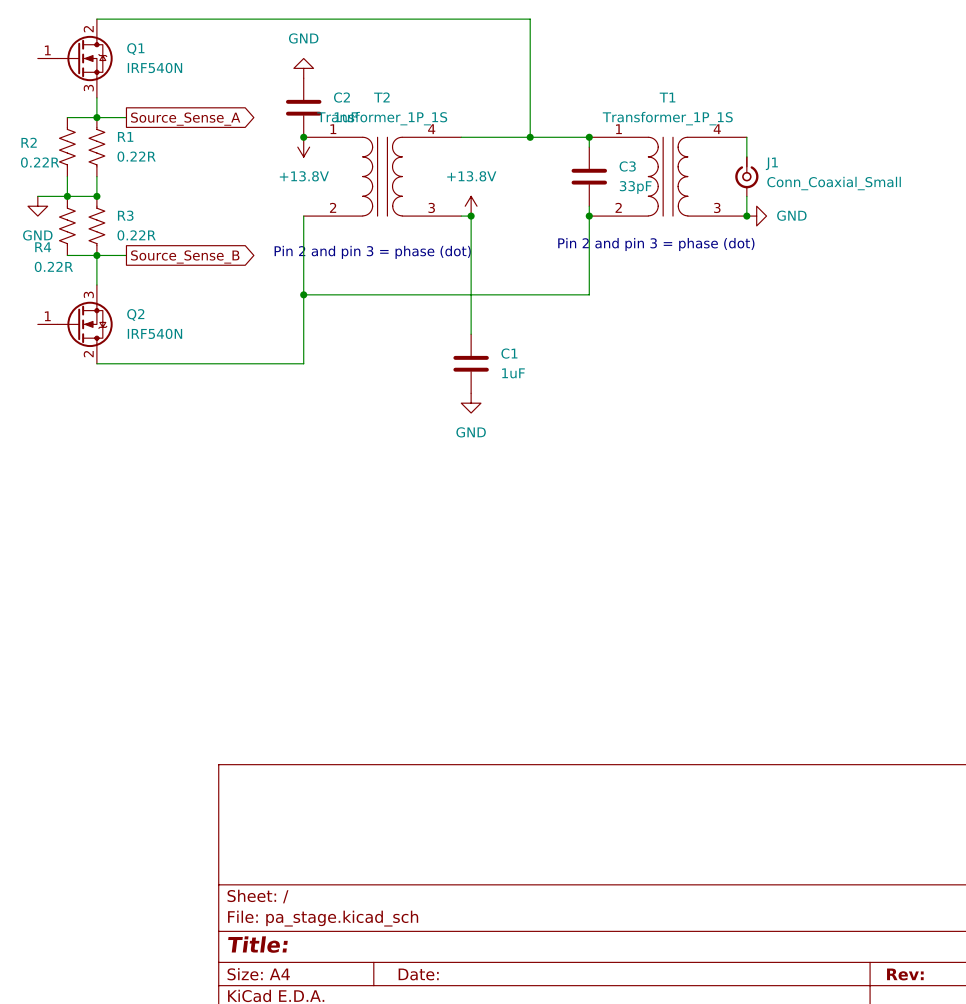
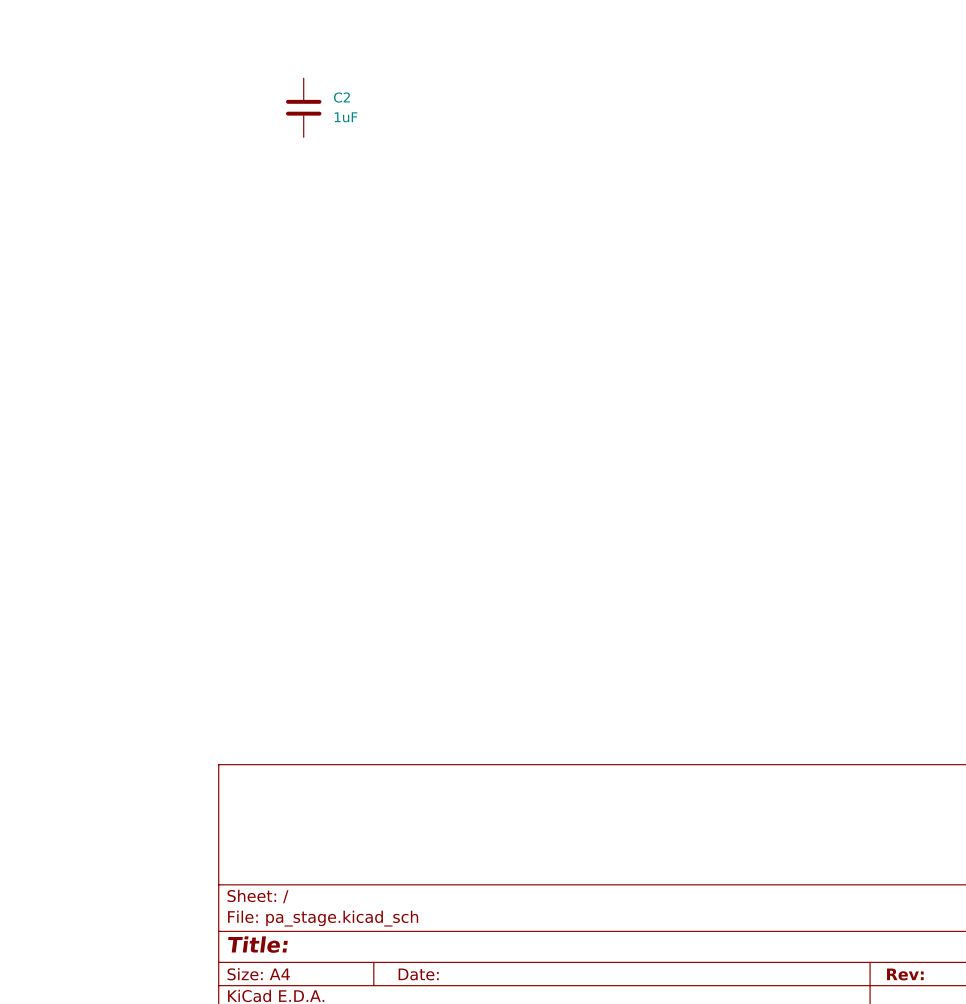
wire: (96, 19) (530, 19) (530, 137) -> none
Q1: IRF540N (75, 58) -> none
power symbol: GND (303, 68) -> none
wire: (96, 97) (96, 117) -> none
wire: (67, 117) (126, 117) -> none
junction: (96, 117) -> none
global label: Source_Sense_A (185, 119) -> none
junction: (303, 137) -> none
wire: (461, 137) (589, 137) (589, 147) -> none
junction: (530, 137) -> none
junction: (589, 137) -> none
wire: (746, 137) (746, 156) -> none
R2: 0.22R (67, 147) -> none
R1: 0.22R (96, 147) -> none
power symbol: +13.8V (303, 147) -> none
wire: (67, 176) (67, 196) -> none
wire: (96, 176) (96, 196) (37, 196) -> none
T2: Transformer_1P_1S (382, 176) -> none
C3: 33pF (589, 176) -> none
T1: Transformer_1P_1S (668, 176) -> none
J1: Conn_Coaxial_Small (746, 176) -> none
junction: (67, 196) -> none
junction: (96, 196) -> none
wire: (746, 196) (746, 216) -> none
power symbol: GND (37, 206) -> none
power symbol: +13.8V (471, 206) -> none
wire: (589, 206) (589, 294) (303, 294) -> none
wire: (303, 216) (303, 363) (96, 363) -> none
wire: (461, 216) (471, 216) (471, 334) -> none
junction: (471, 216) -> none
junction: (589, 216) -> none
junction: (746, 216) -> none
power symbol: GND (756, 216) -> none
R4: 0.22R (67, 225) -> none
R3: 0.22R (96, 225) -> none
text: Pin 2 and pin 3 = phase (dot) (656, 244) -> none
text: Pin 2 and pin 3 = phase (dot) (372, 252) -> none
wire: (67, 255) (126, 255) -> none
wire: (96, 255) (96, 285) -> none
junction: (96, 255) -> none
global label: Source_Sense_B (185, 256) -> none
junction: (303, 294) -> none
Q2: IRF540N (75, 324) -> none
C1: 1uF (471, 363) -> none
power symbol: GND (471, 403) -> none

